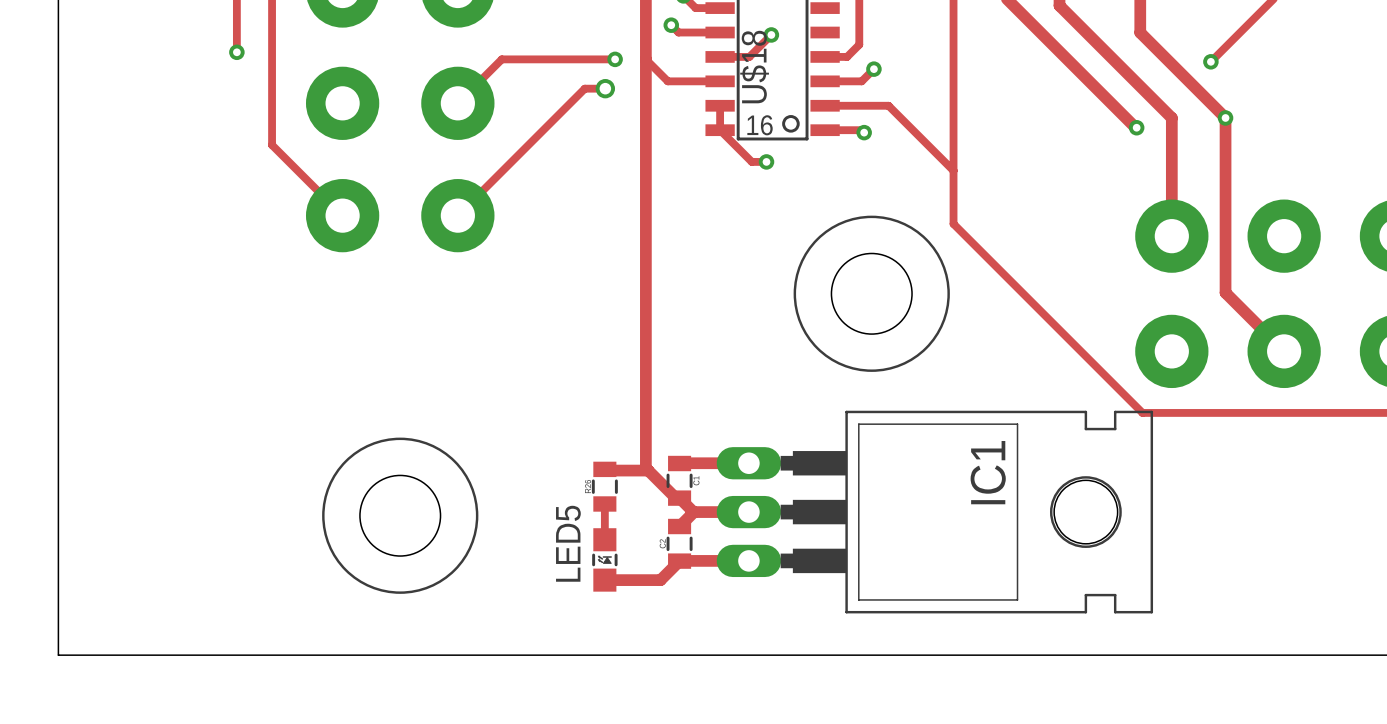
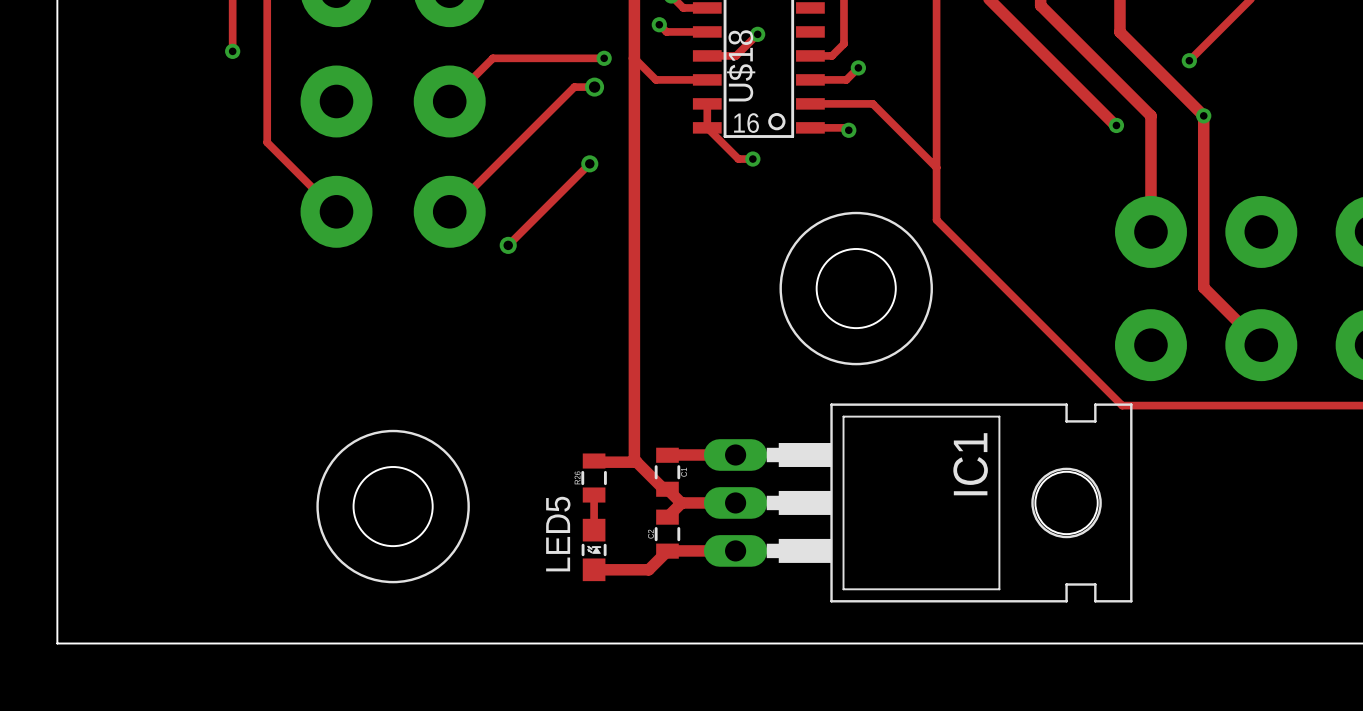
track: none -> (589, 163) (508, 245)
via: none -> (589, 163)
via: none -> (508, 245)

